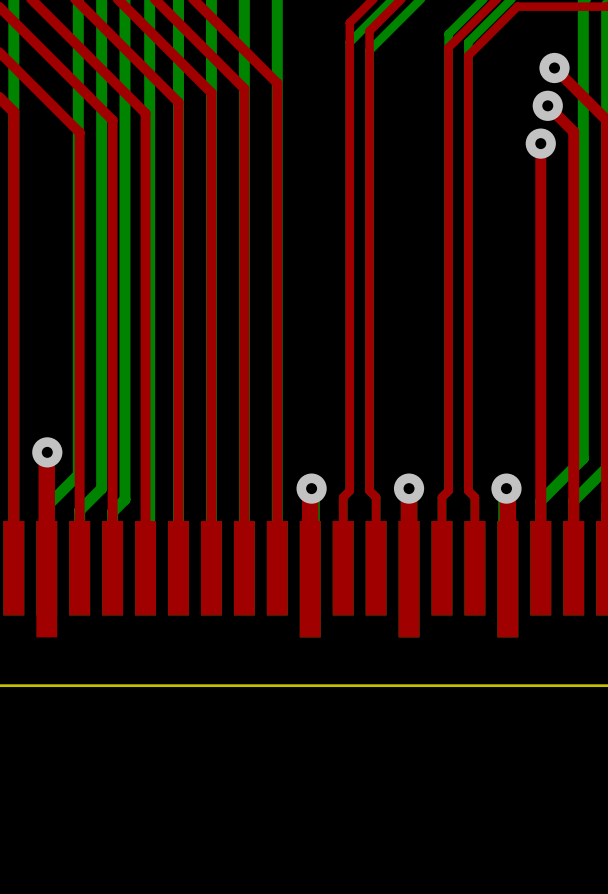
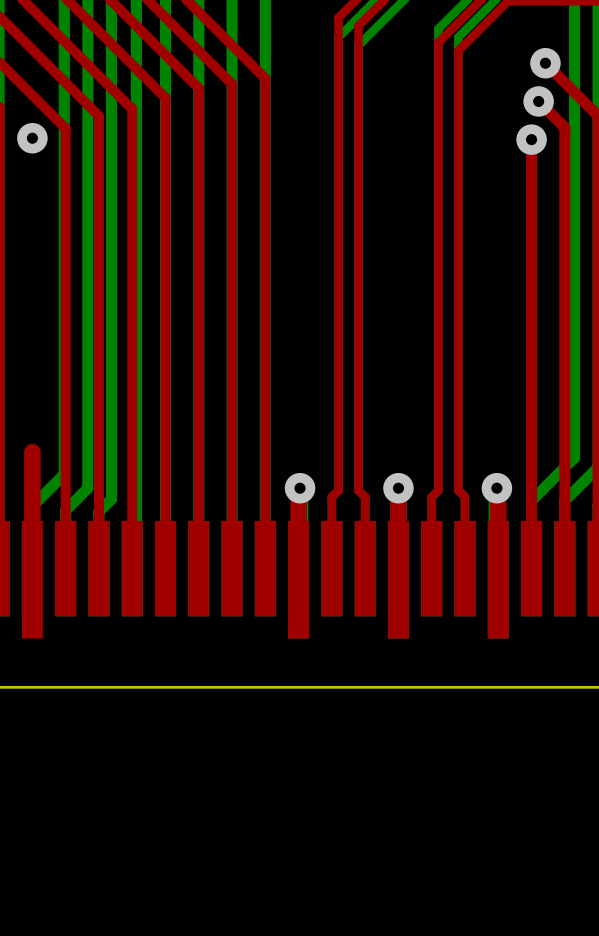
via position: (47, 452) -> (32, 138)

